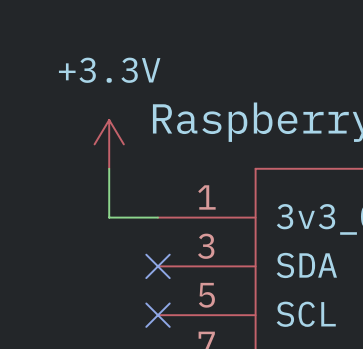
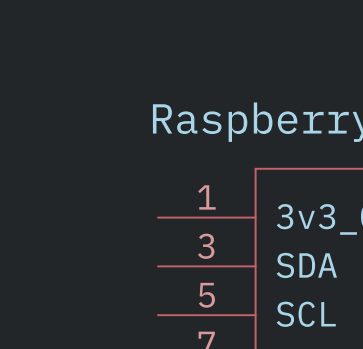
power symbol: +3.3V (109, 144) -> none
wire: (109, 168) (109, 217) (158, 217) -> none
no-connect mark: (158, 266) -> none
no-connect mark: (158, 315) -> none

